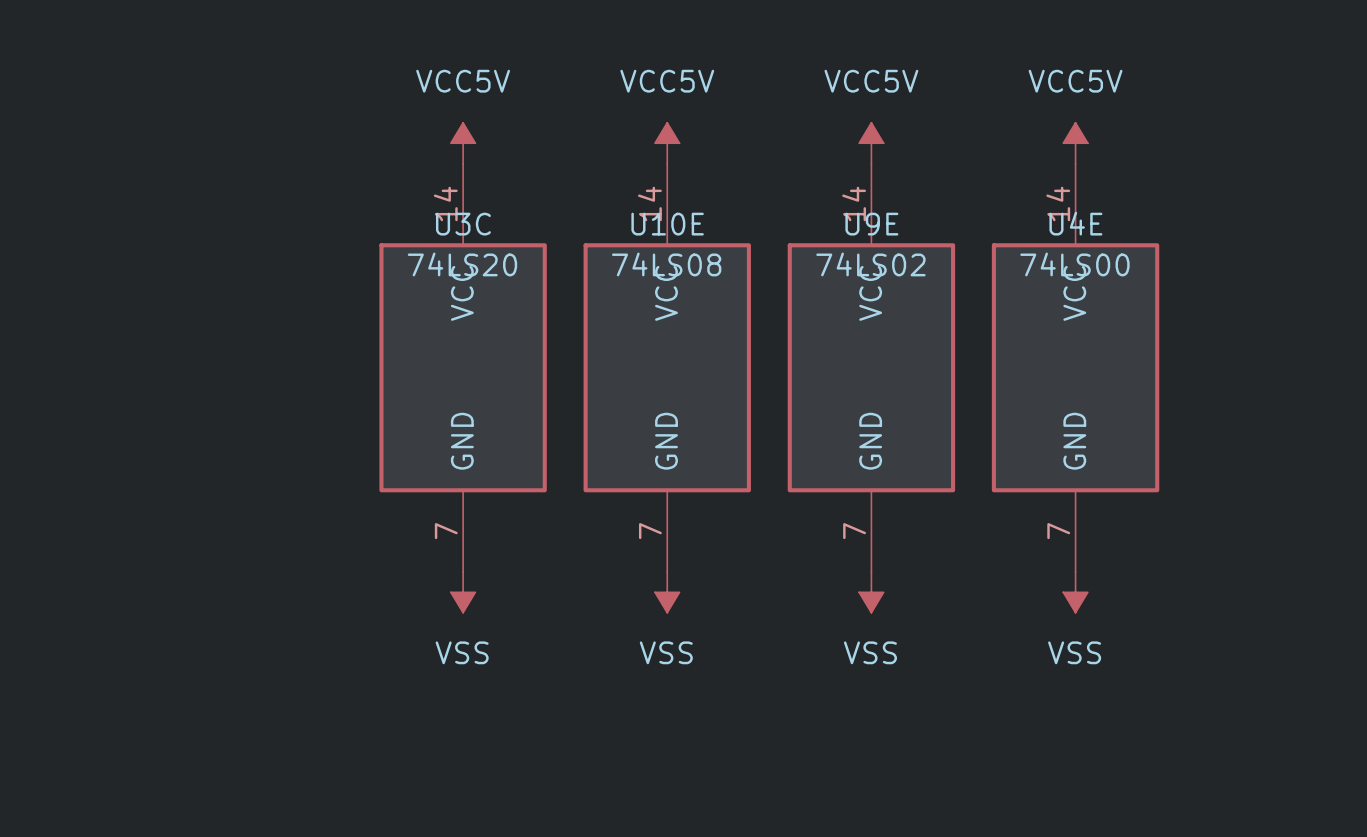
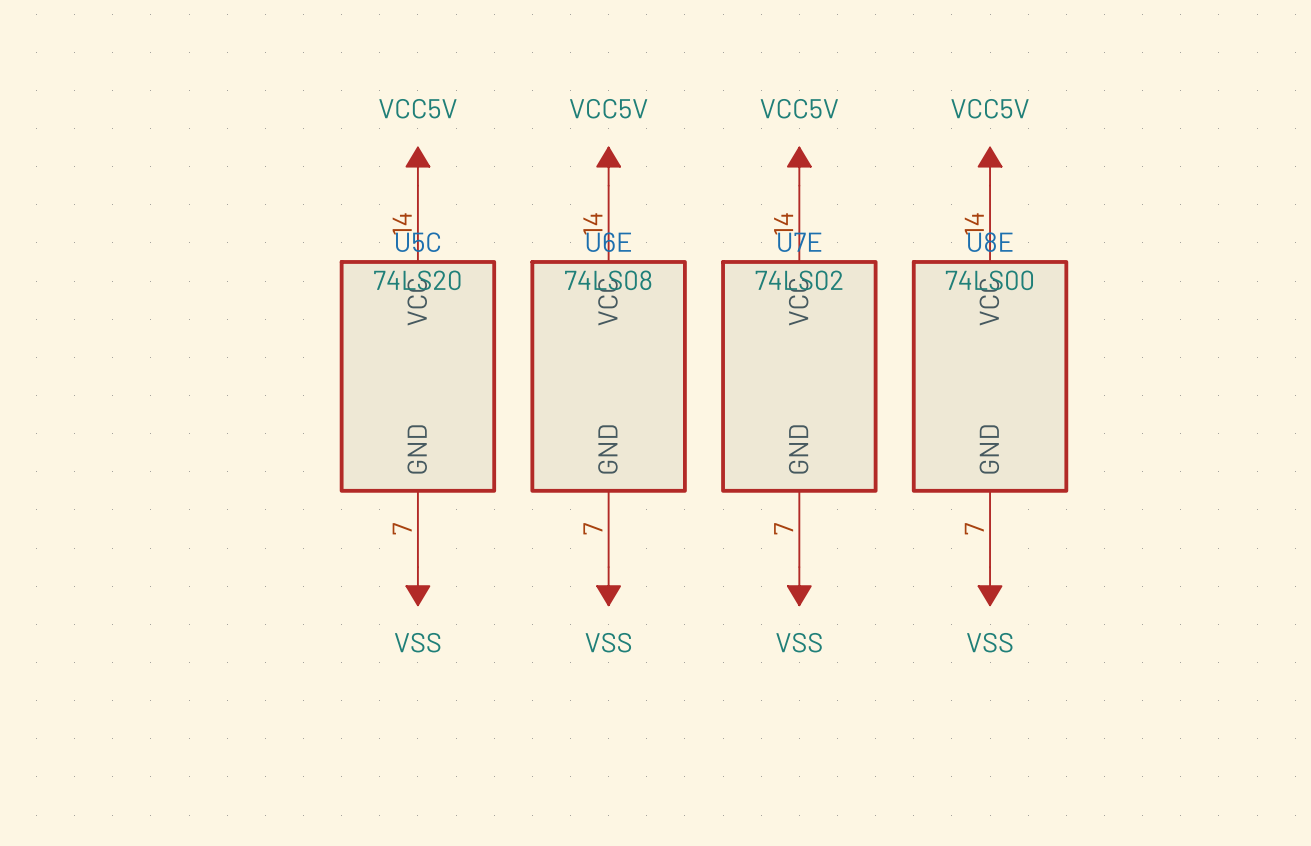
U4E name: U4E (1075, 223) -> U8E (990, 242)
U3C name: U3C (463, 224) -> U5C (418, 242)
U10E name: U10E (667, 224) -> U6E (608, 242)
U9E name: U9E (871, 224) -> U7E (799, 242)

